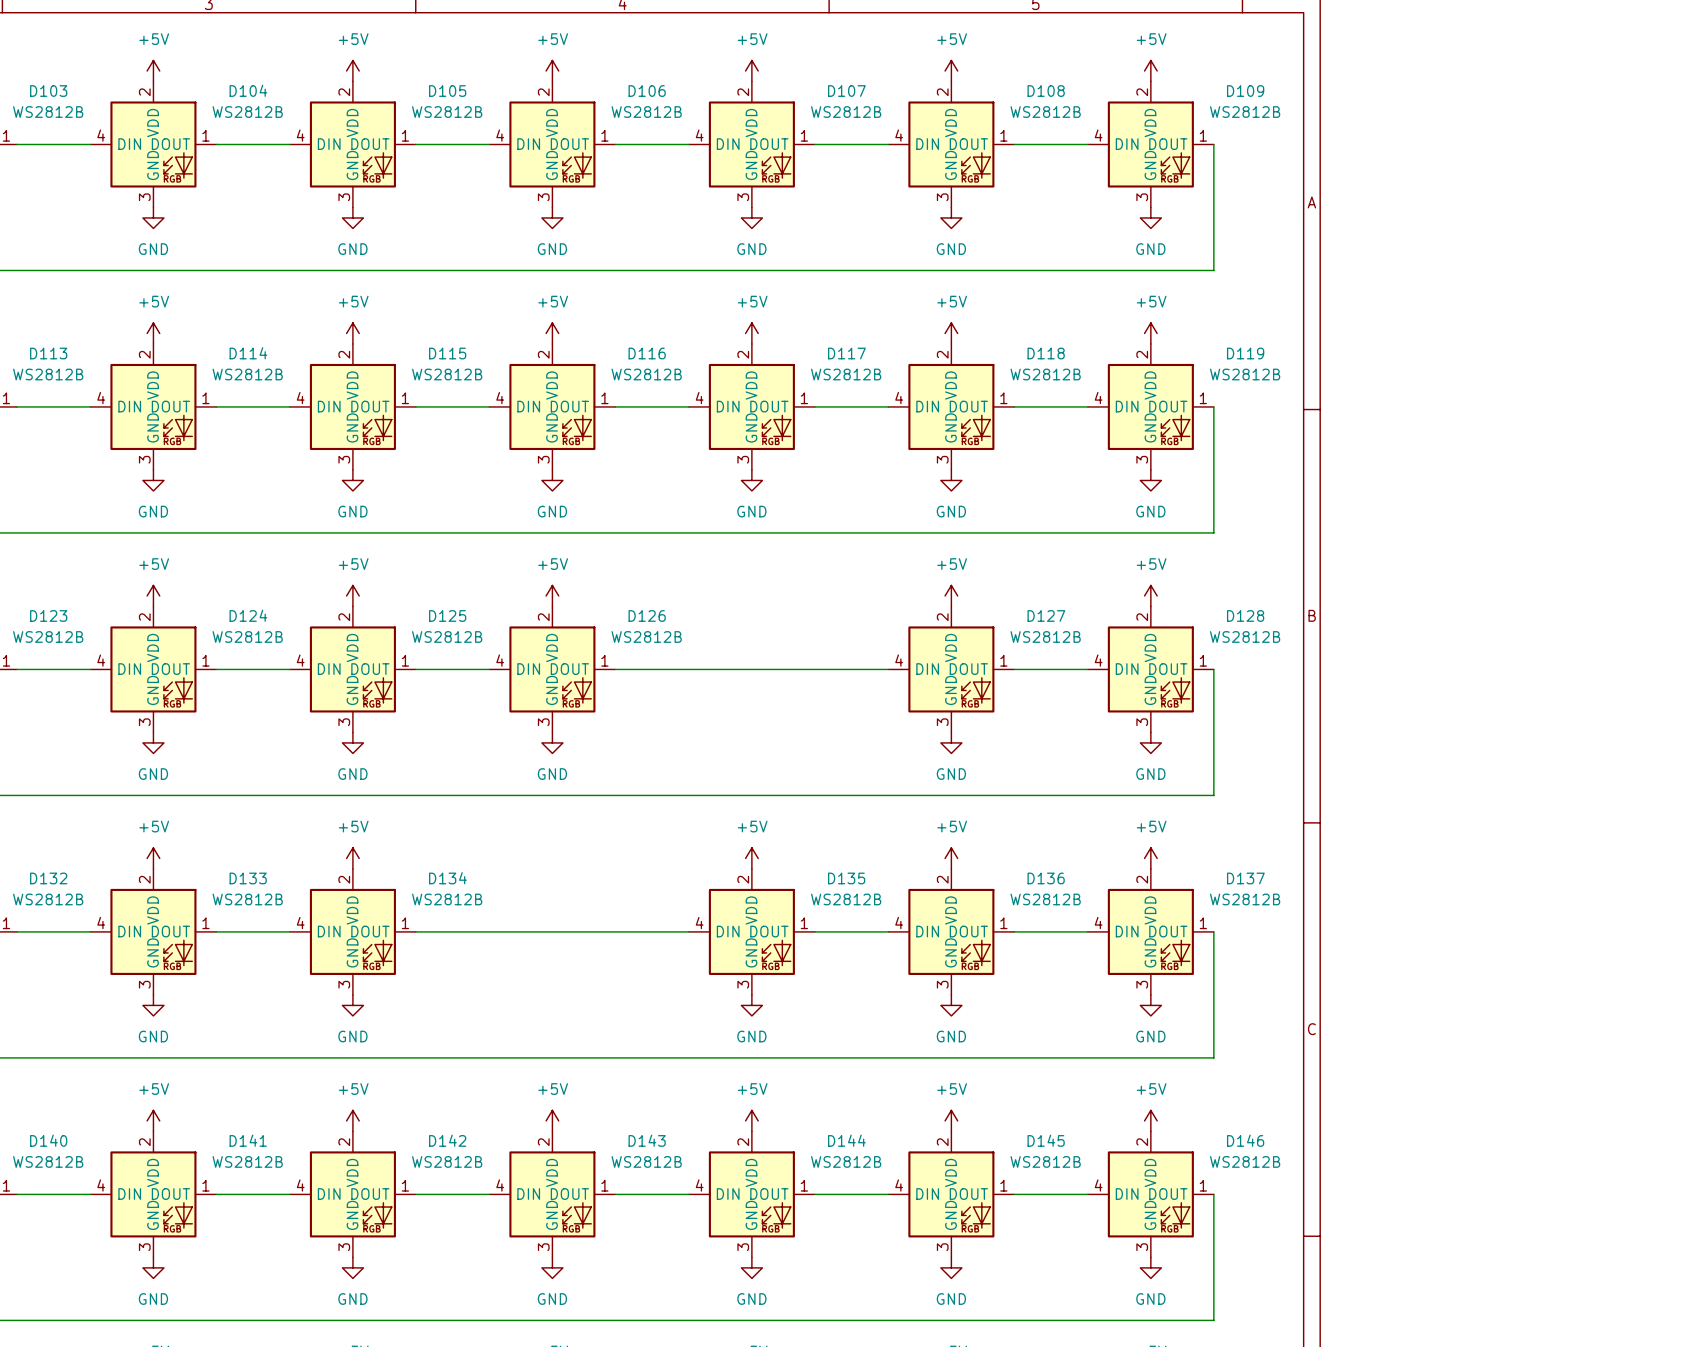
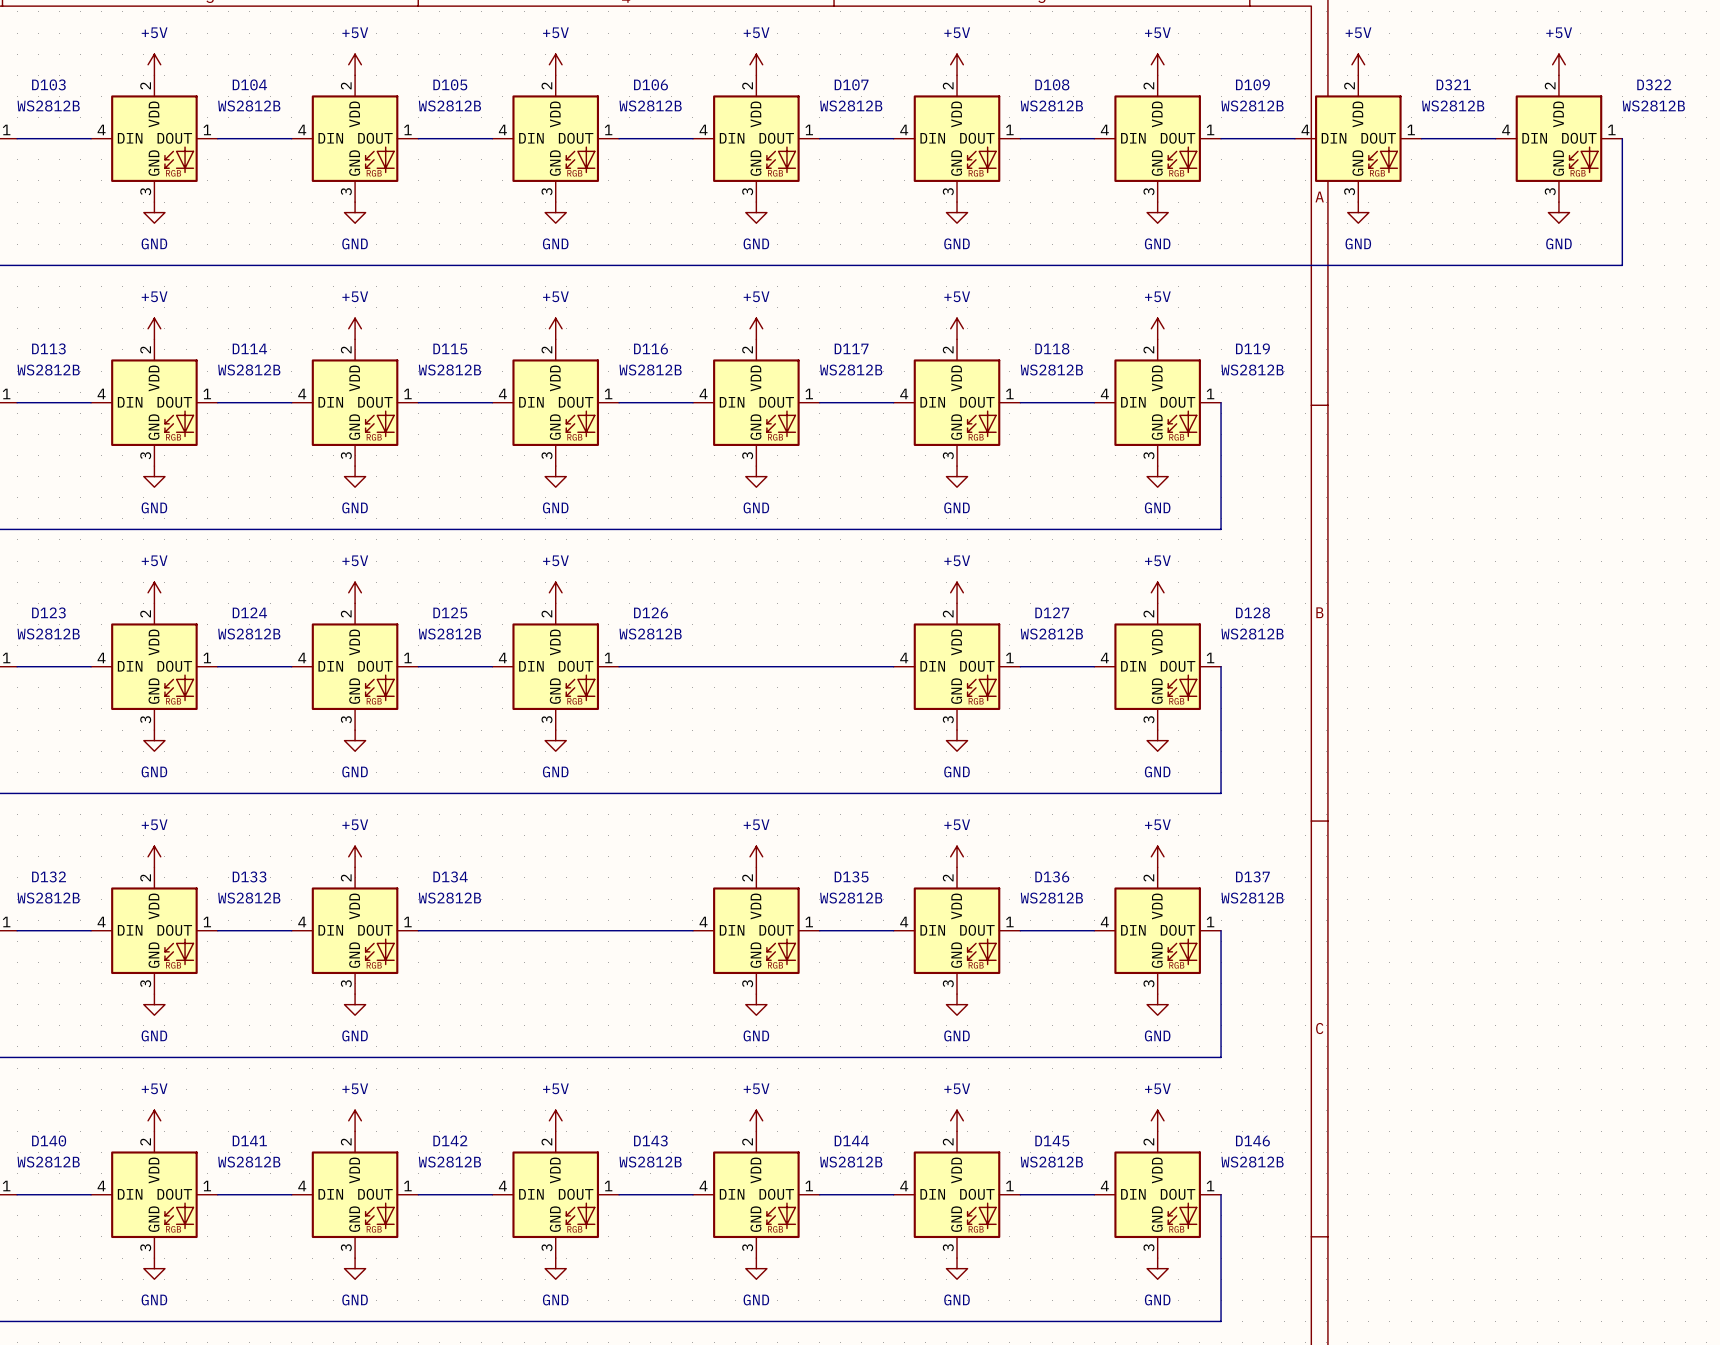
power symbol: none -> +5V (1358, 64)
power symbol: none -> +5V (1558, 64)
wire: (1213, 144) (1213, 270) -> (1221, 138) (1294, 138)
D321: none -> WS2812B (1358, 138)
wire: none -> (1421, 138) (1495, 138)
D322: none -> WS2812B (1558, 138)
wire: none -> (1622, 138) (1622, 265) (1221, 265)
power symbol: none -> GND (1358, 212)
power symbol: none -> GND (1558, 212)

